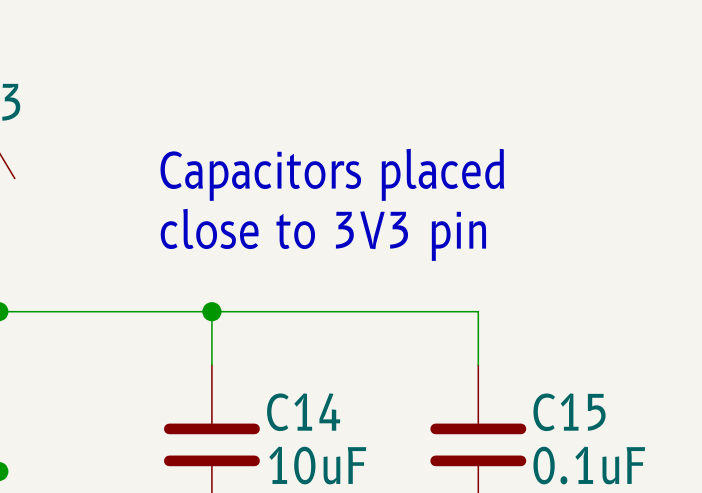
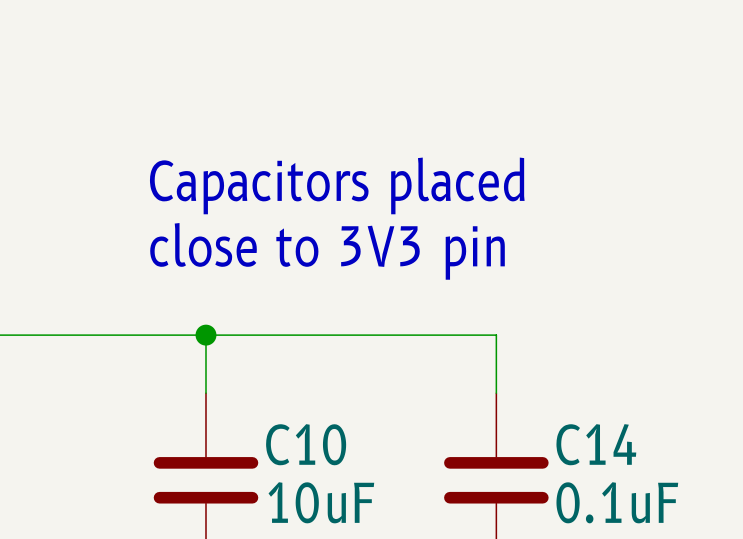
C14 name: C14 (303, 412) -> C10 (306, 444)
C15 name: C15 (569, 412) -> C14 (596, 444)

